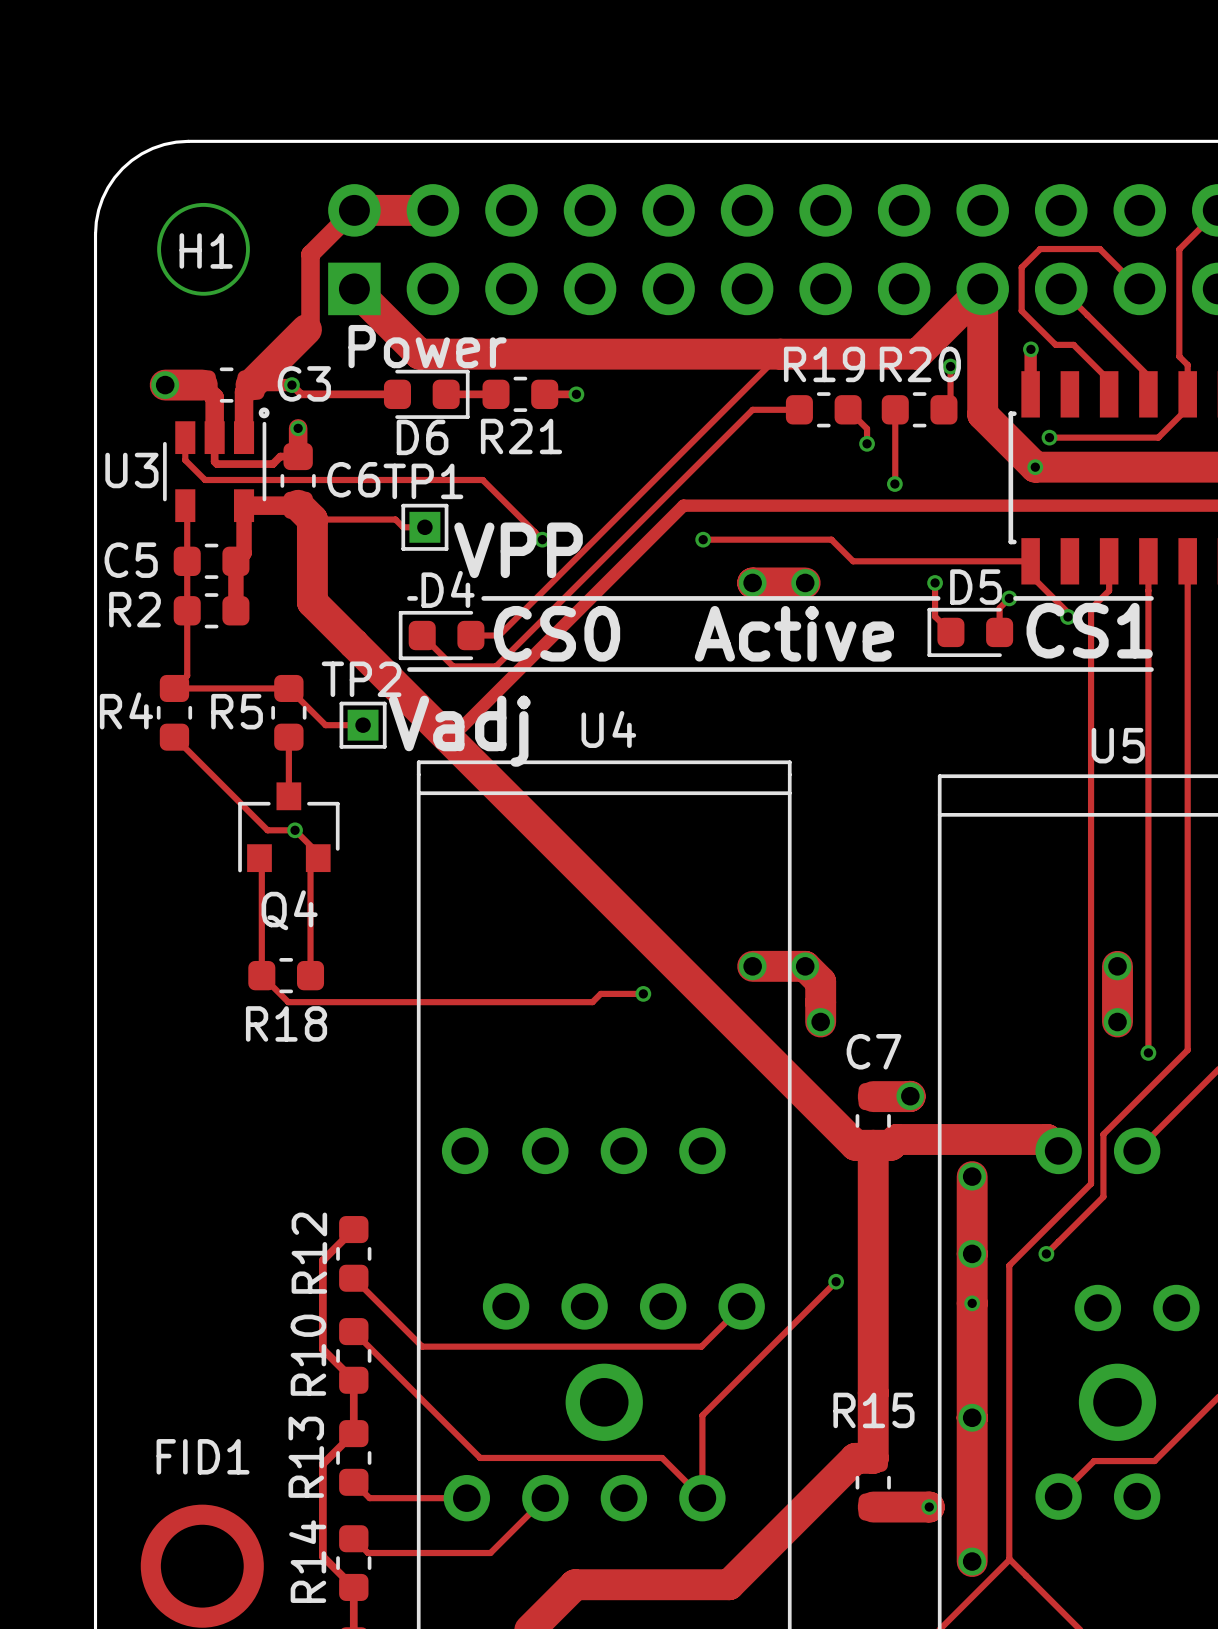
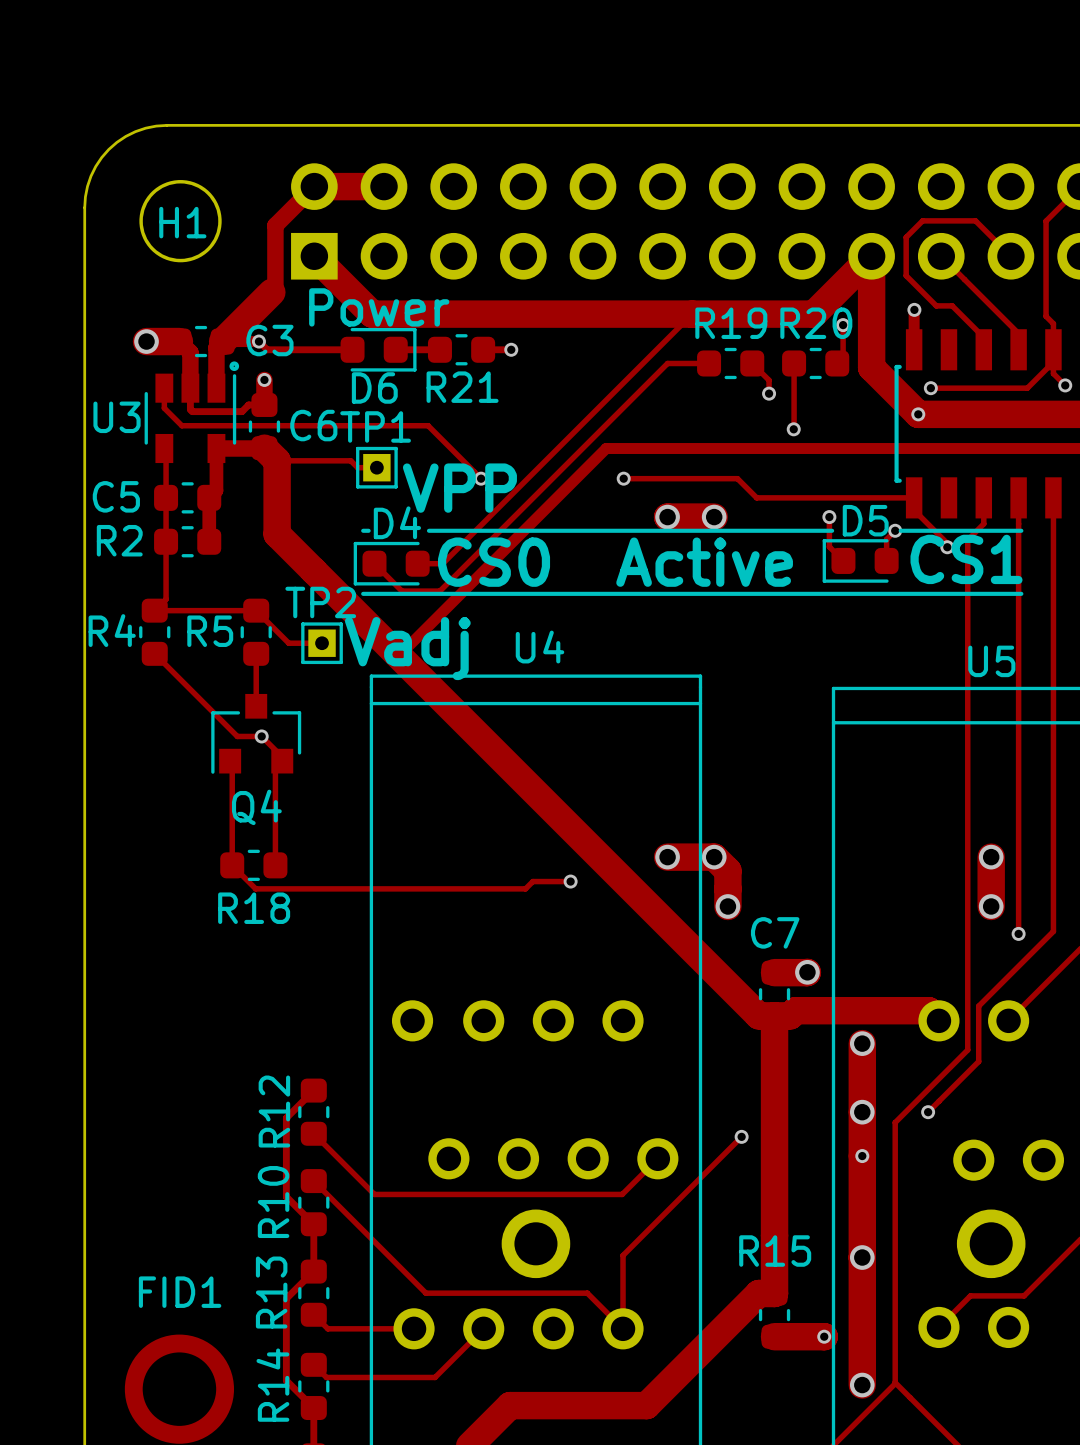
track: none -> (1053, 362) (1053, 373) (1065, 385)
via: none -> (1065, 385)

